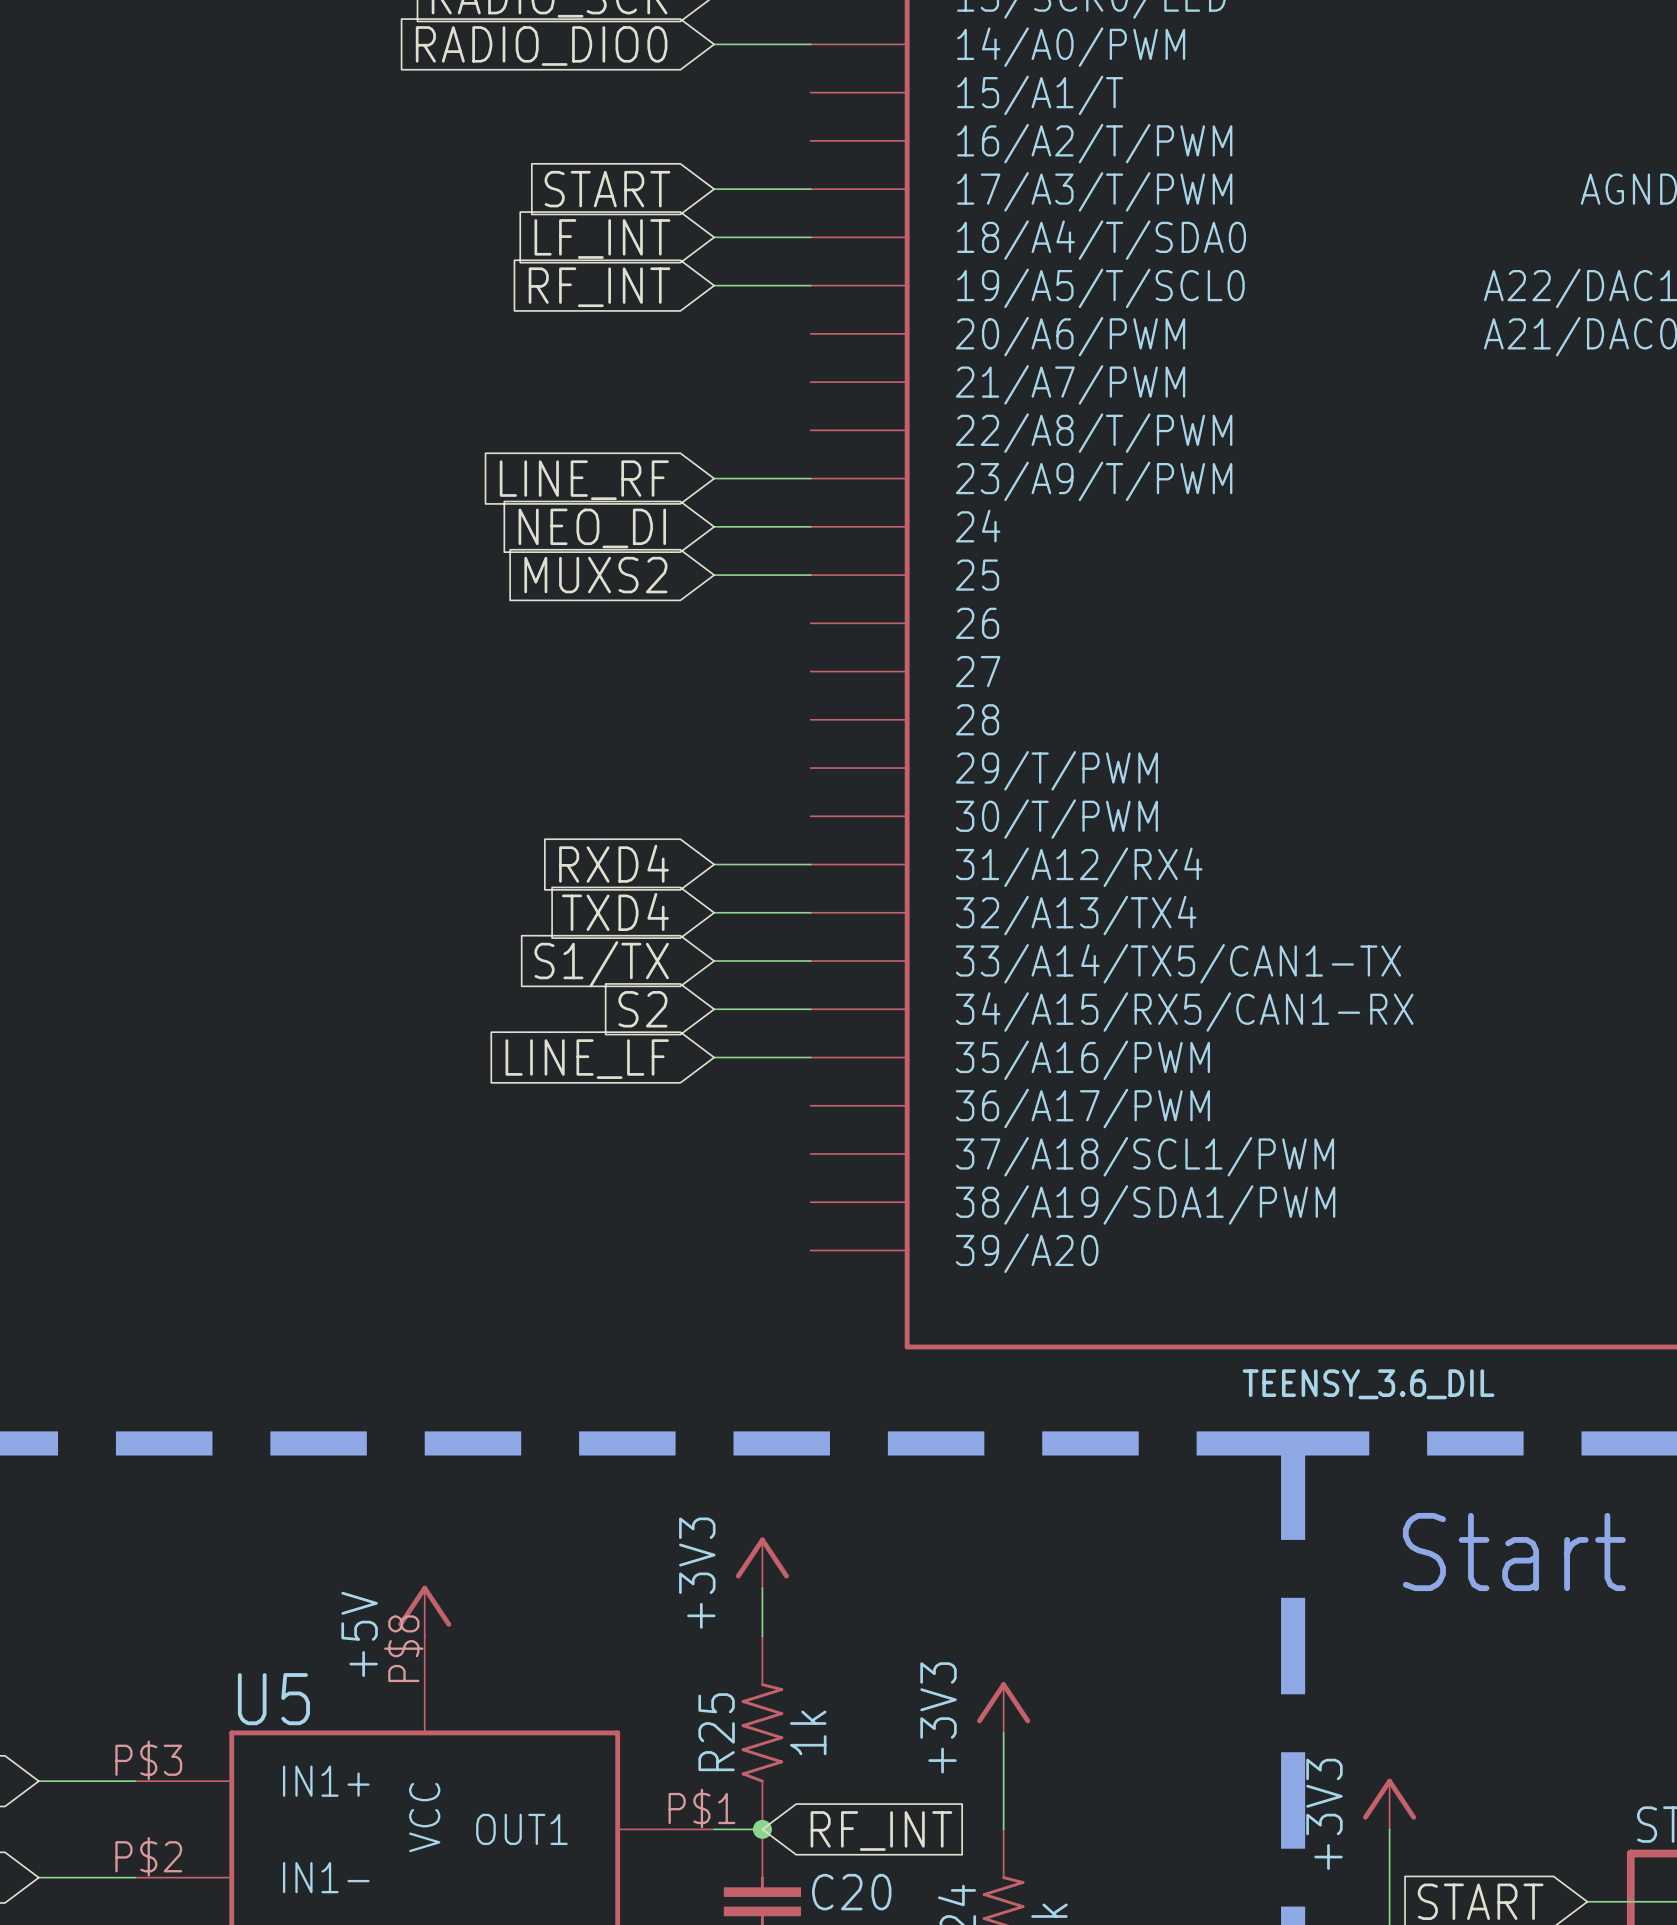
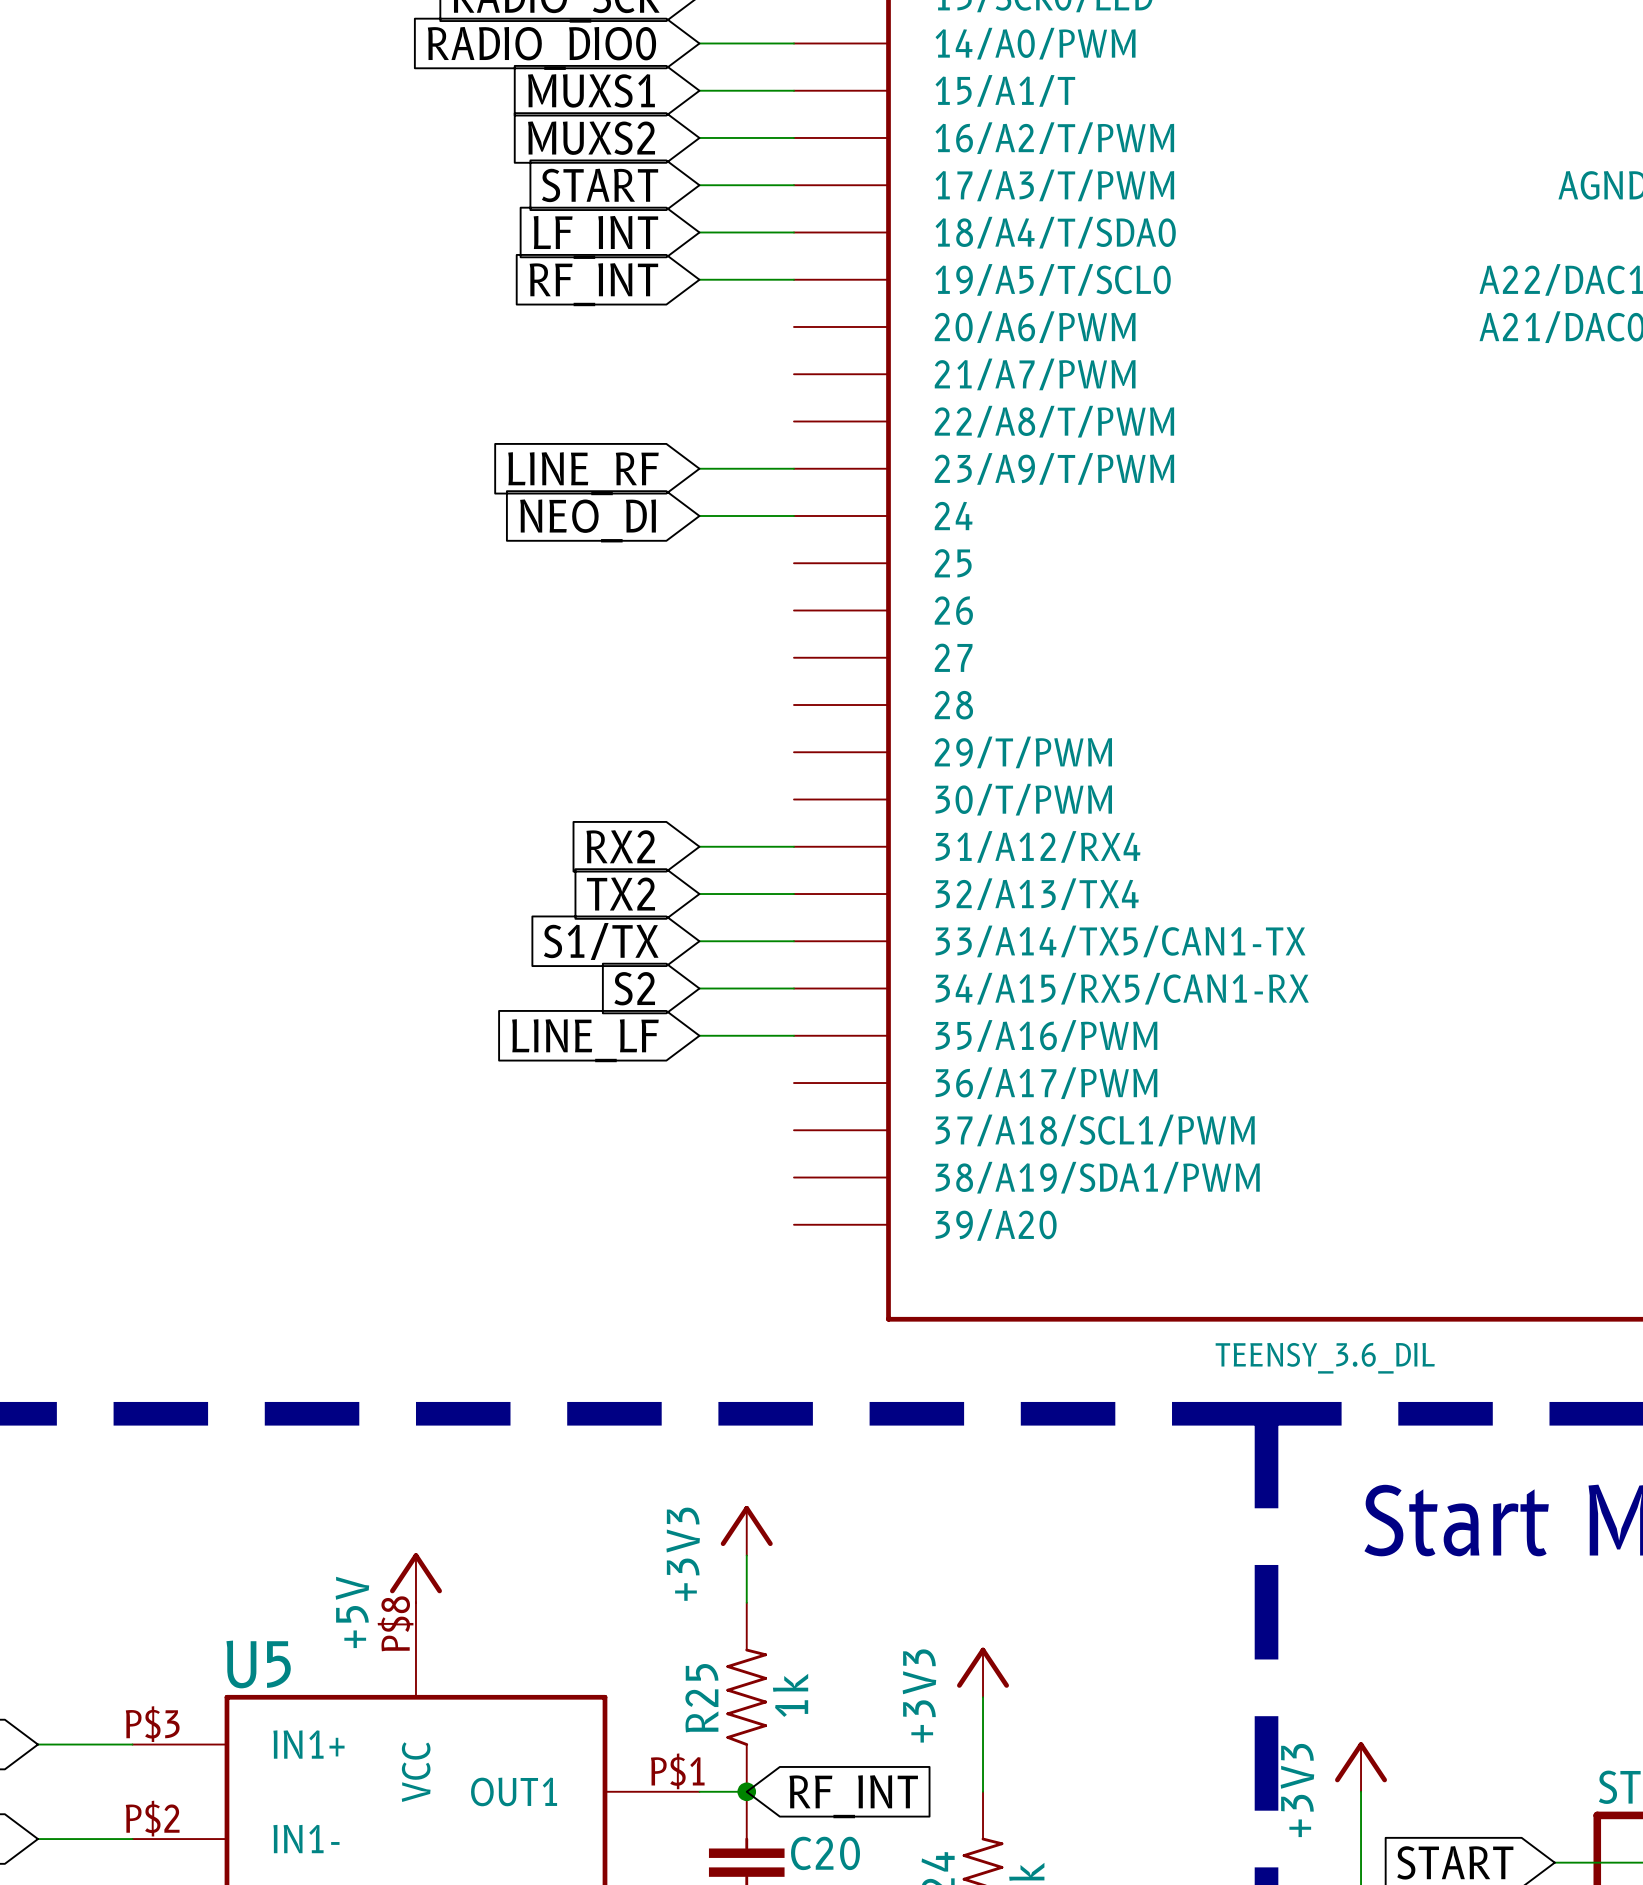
global label: none -> MUXS1 (591, 90)
wire: none -> (699, 90) (794, 90)
global label position: MUXS2 (595, 575) -> MUXS2 (591, 138)
wire: (714, 575) (810, 575) -> (699, 137) (794, 137)
global label: RXD4 (613, 863) -> RX2 (620, 846)
global label: TXD4 (615, 911) -> TX2 (620, 894)

